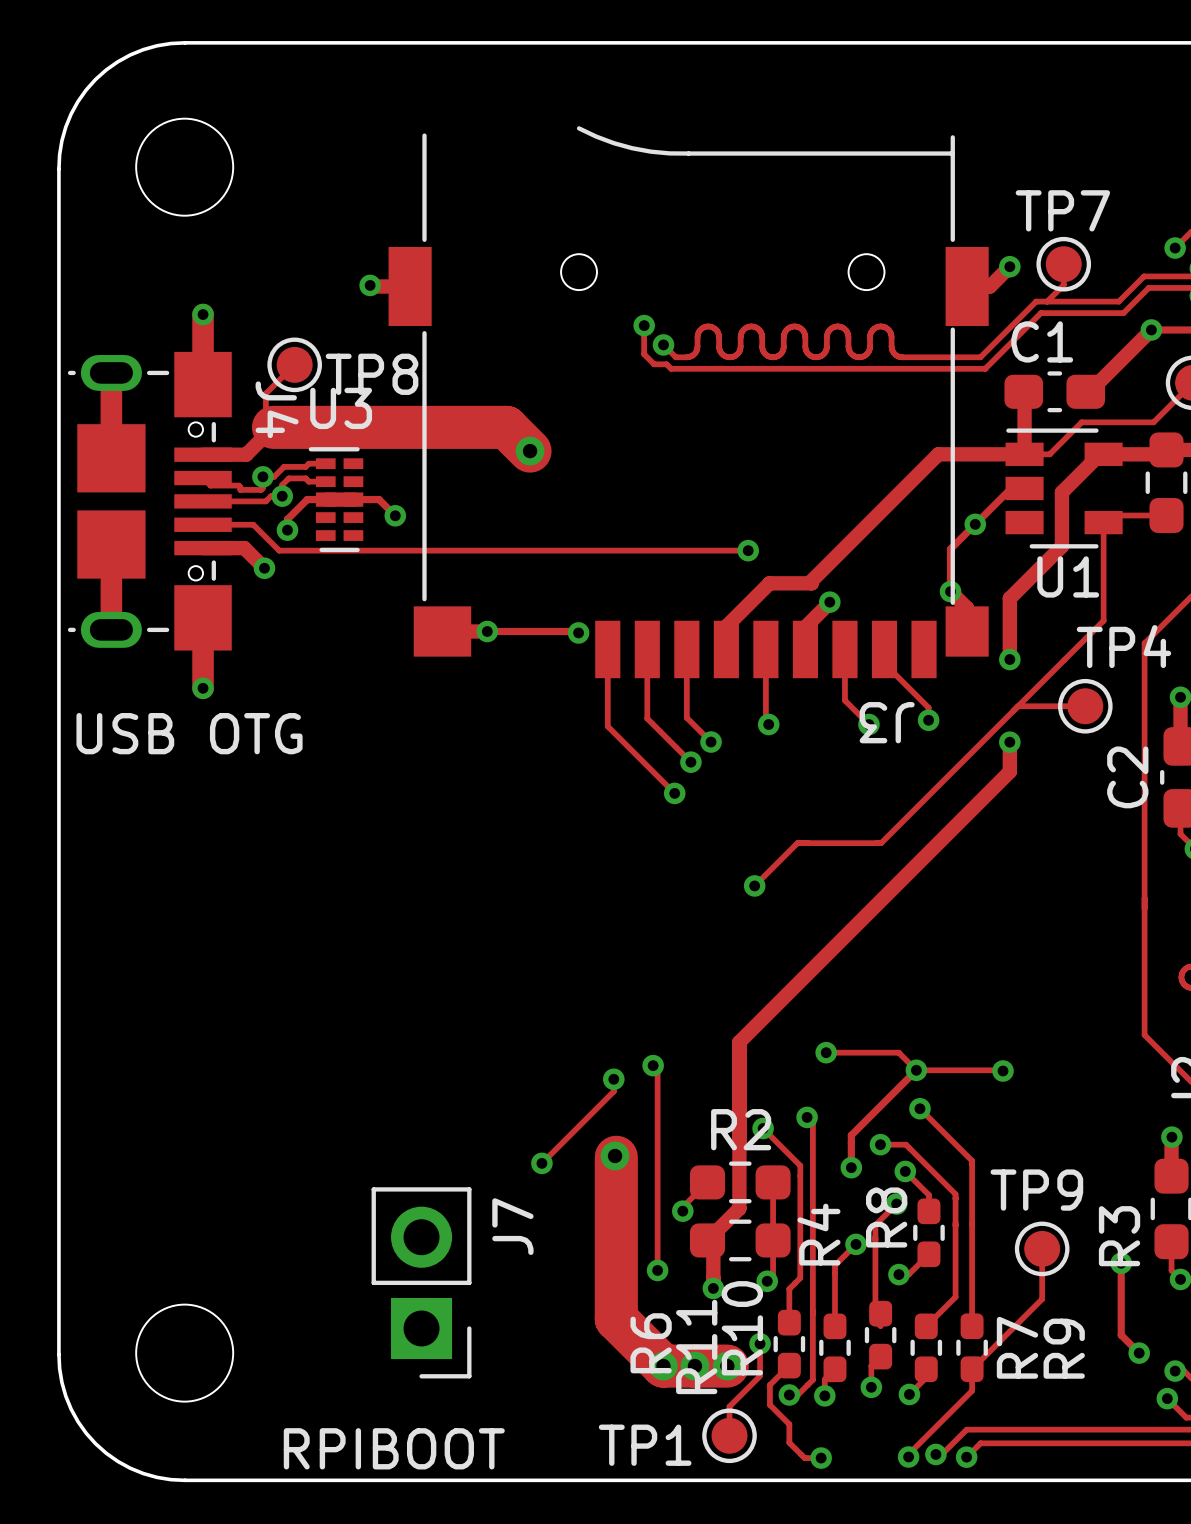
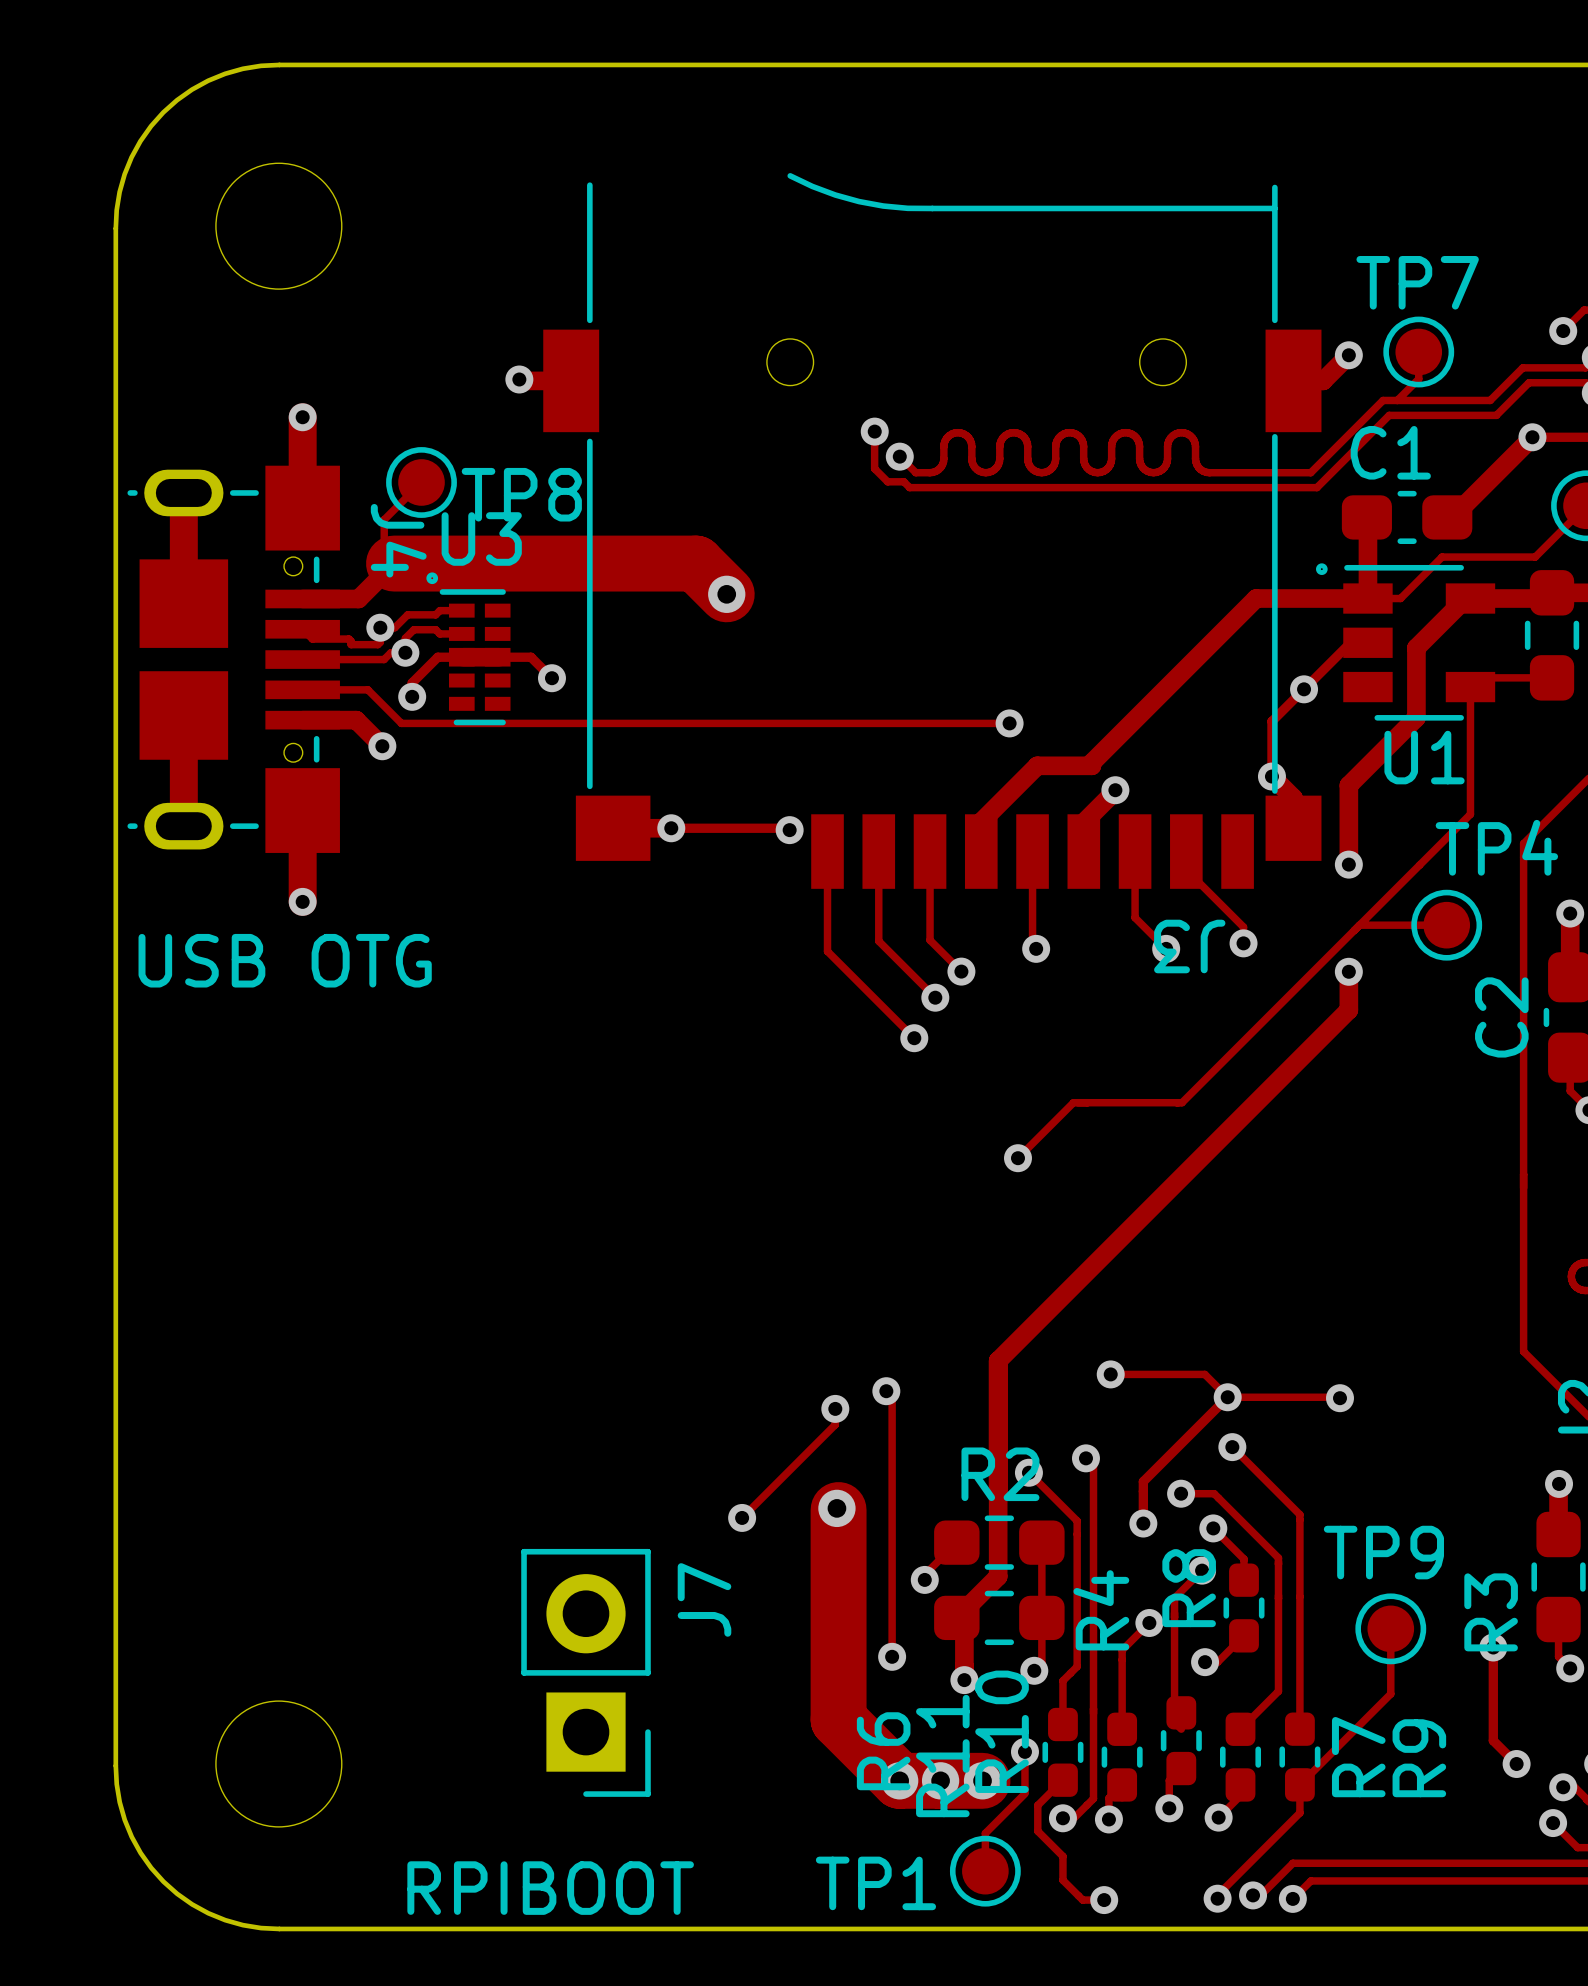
drawing: none -> [1315, 563, 1328, 576]
drawing: none -> [426, 572, 439, 585]

